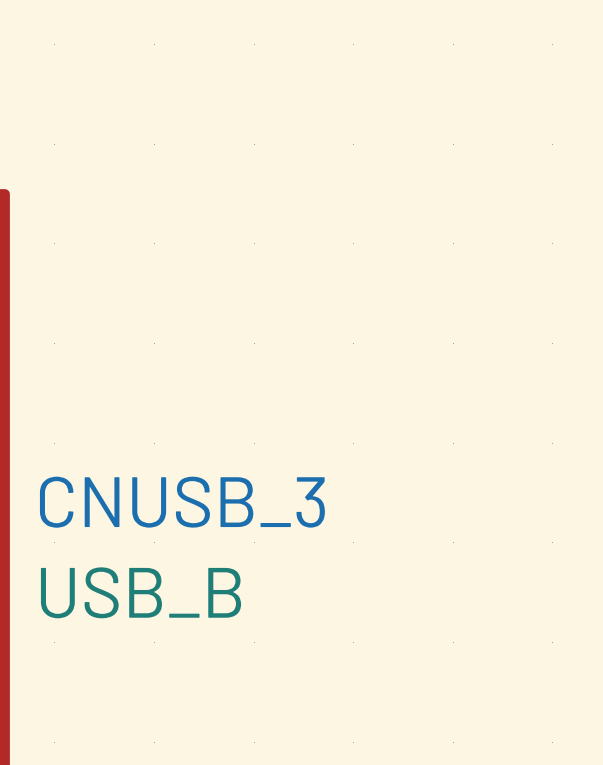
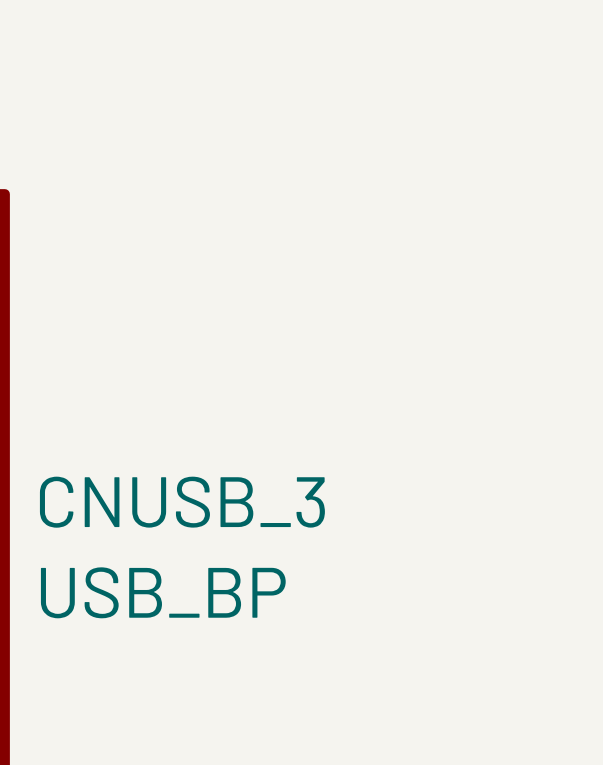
CNUSB_3 value: USB_B (140, 592) -> USB_BP (163, 592)

